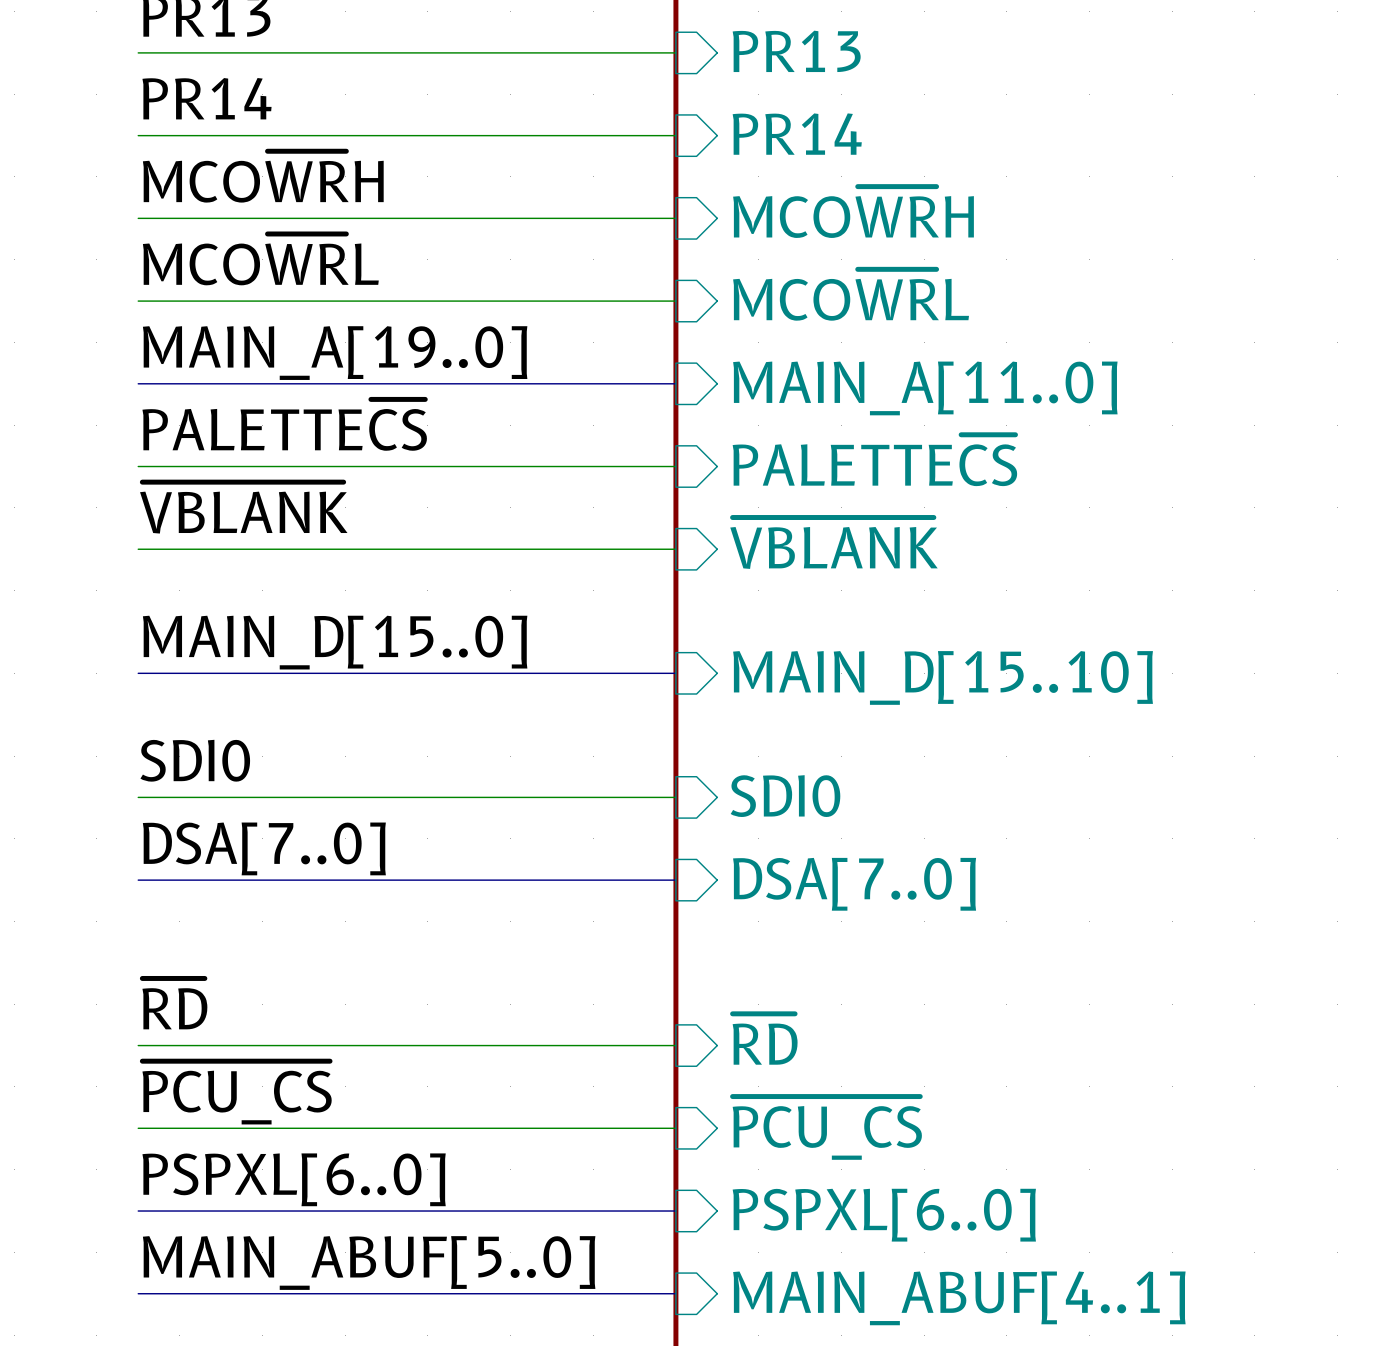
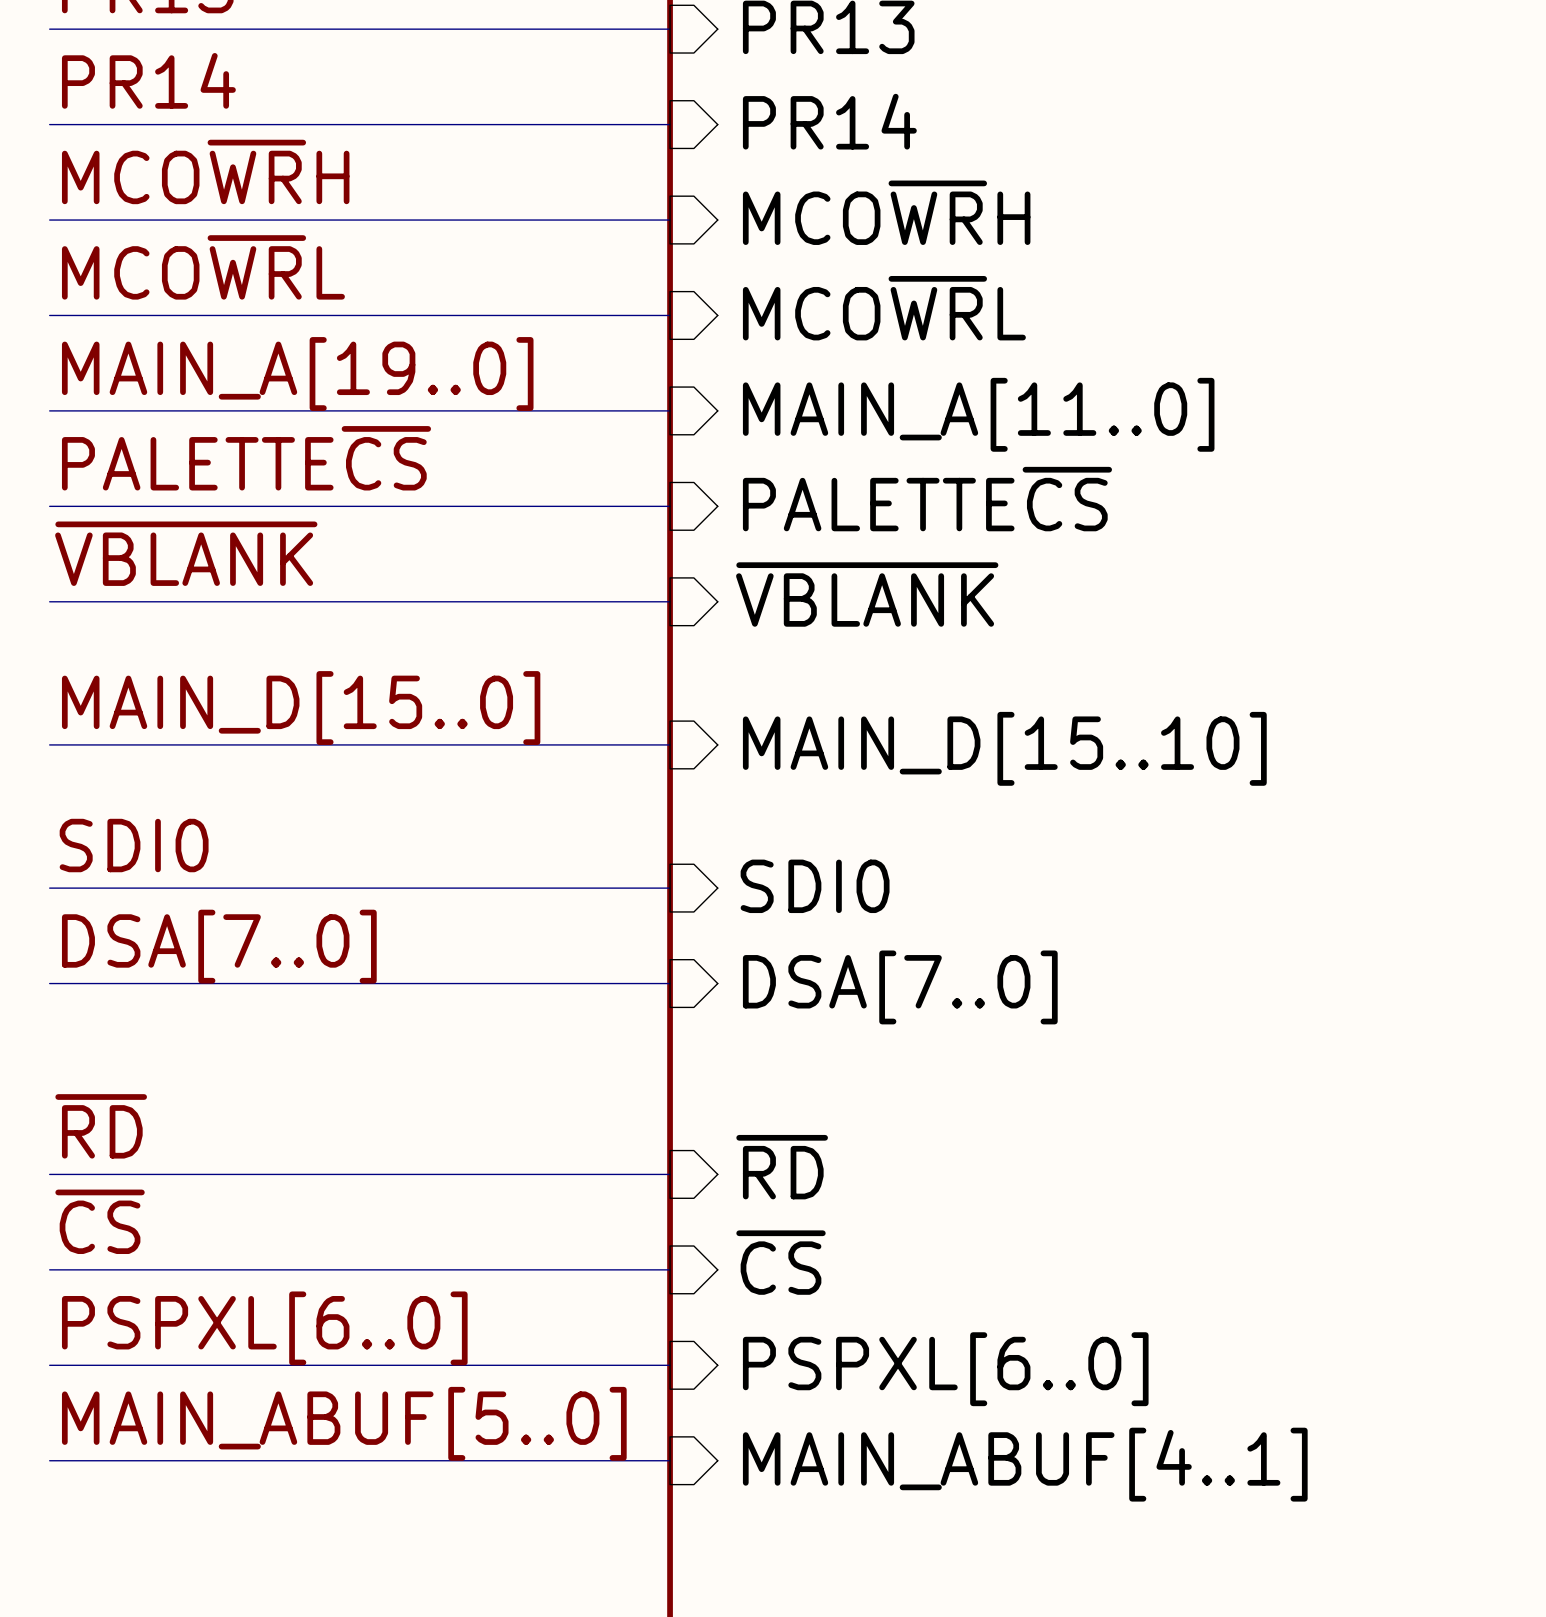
label: ~{PCU_CS} (237, 1092) -> ~{CS} (100, 1221)
sheet pin: ~{PCU_CS} (827, 1128) -> ~{CS} (781, 1262)

